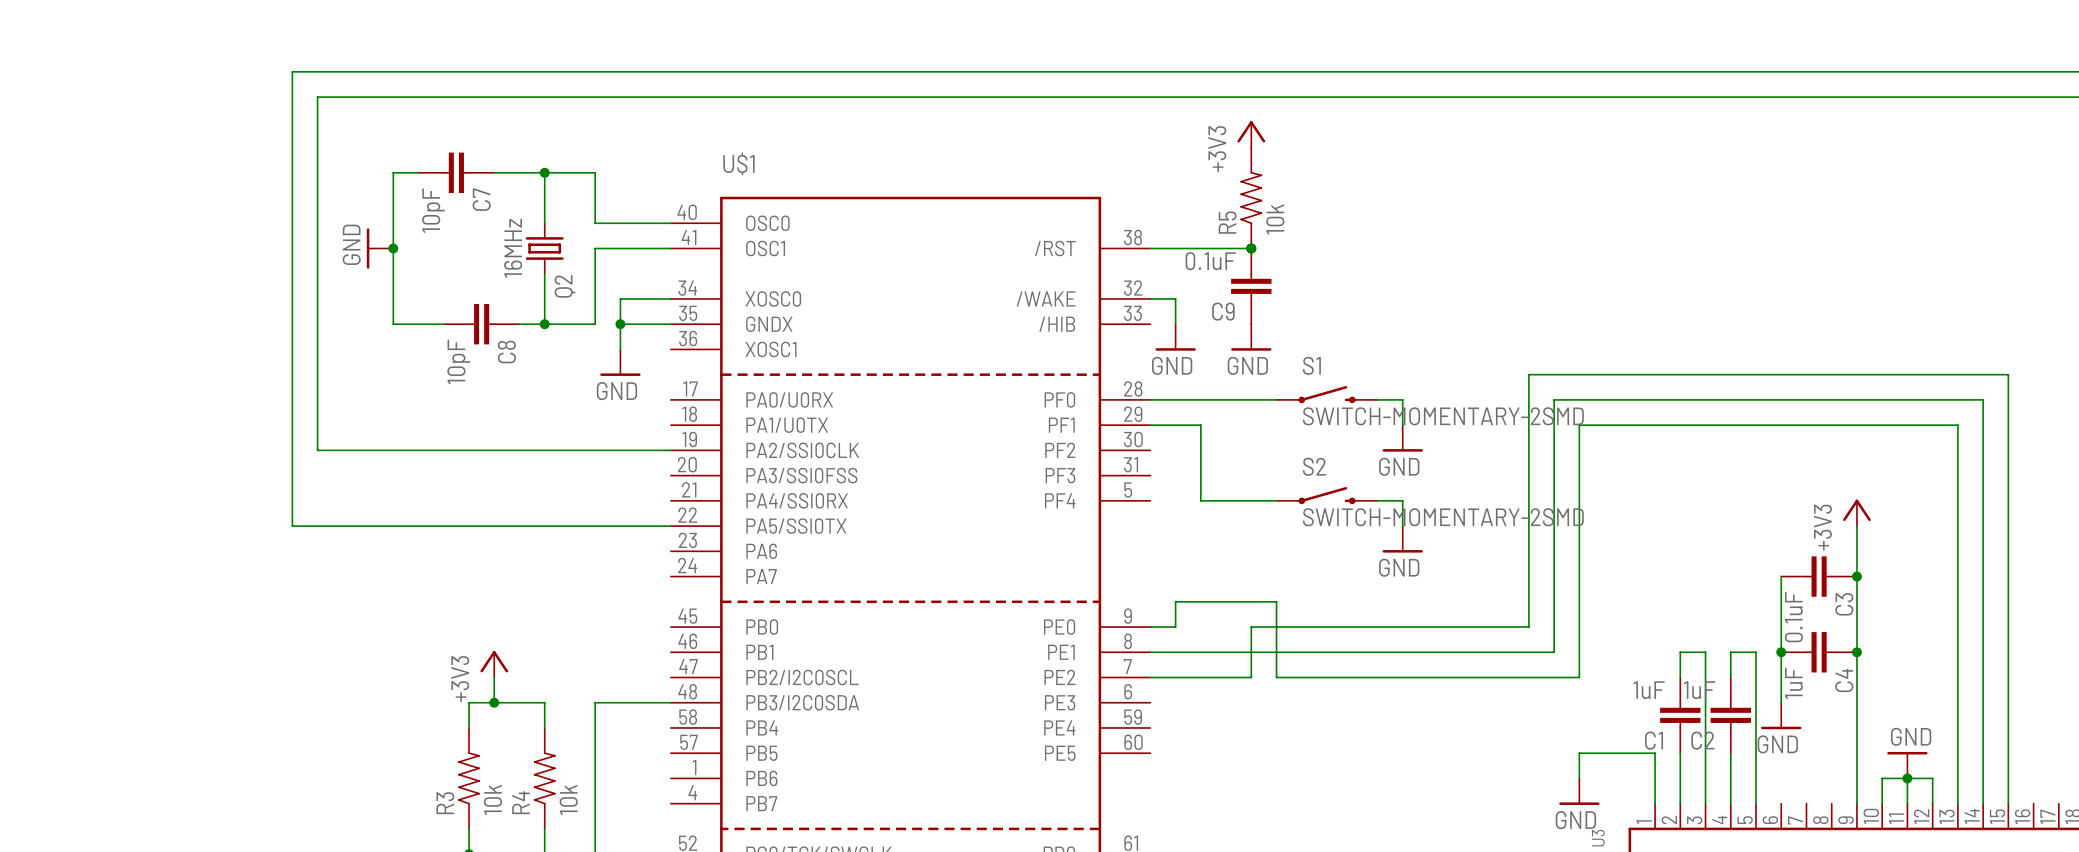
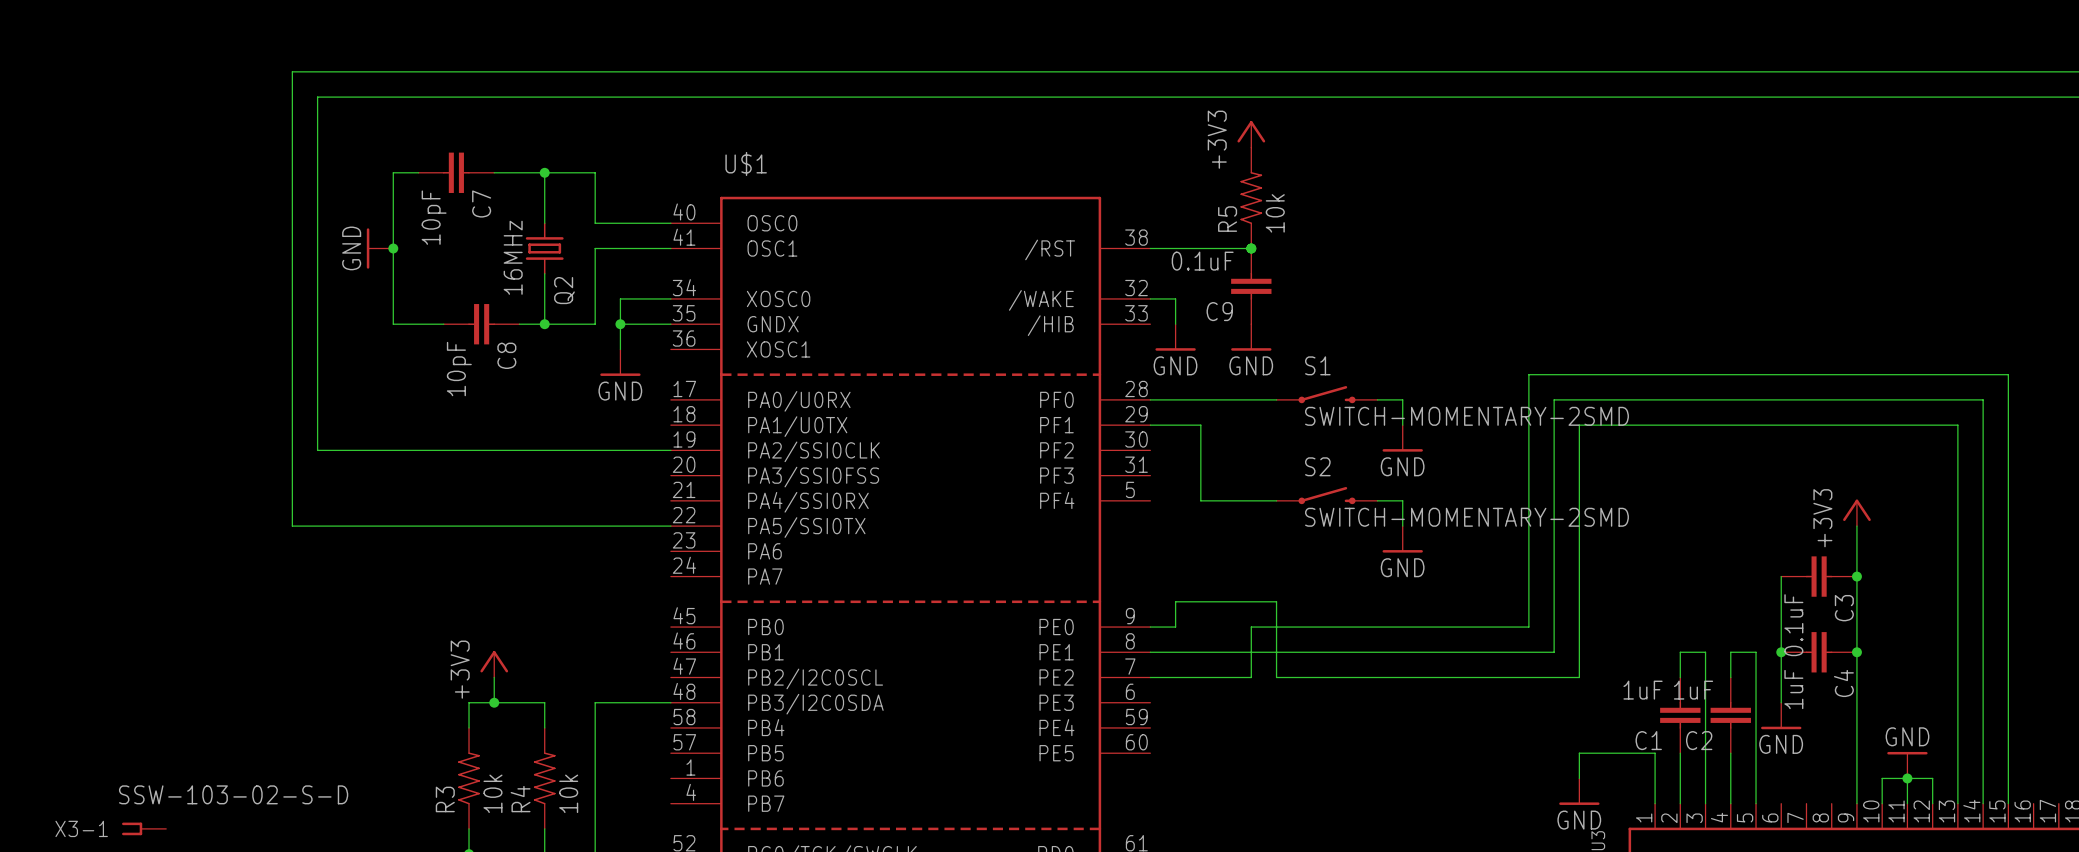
X3-1: none -> SSW-103-02-S-D (144, 828)

